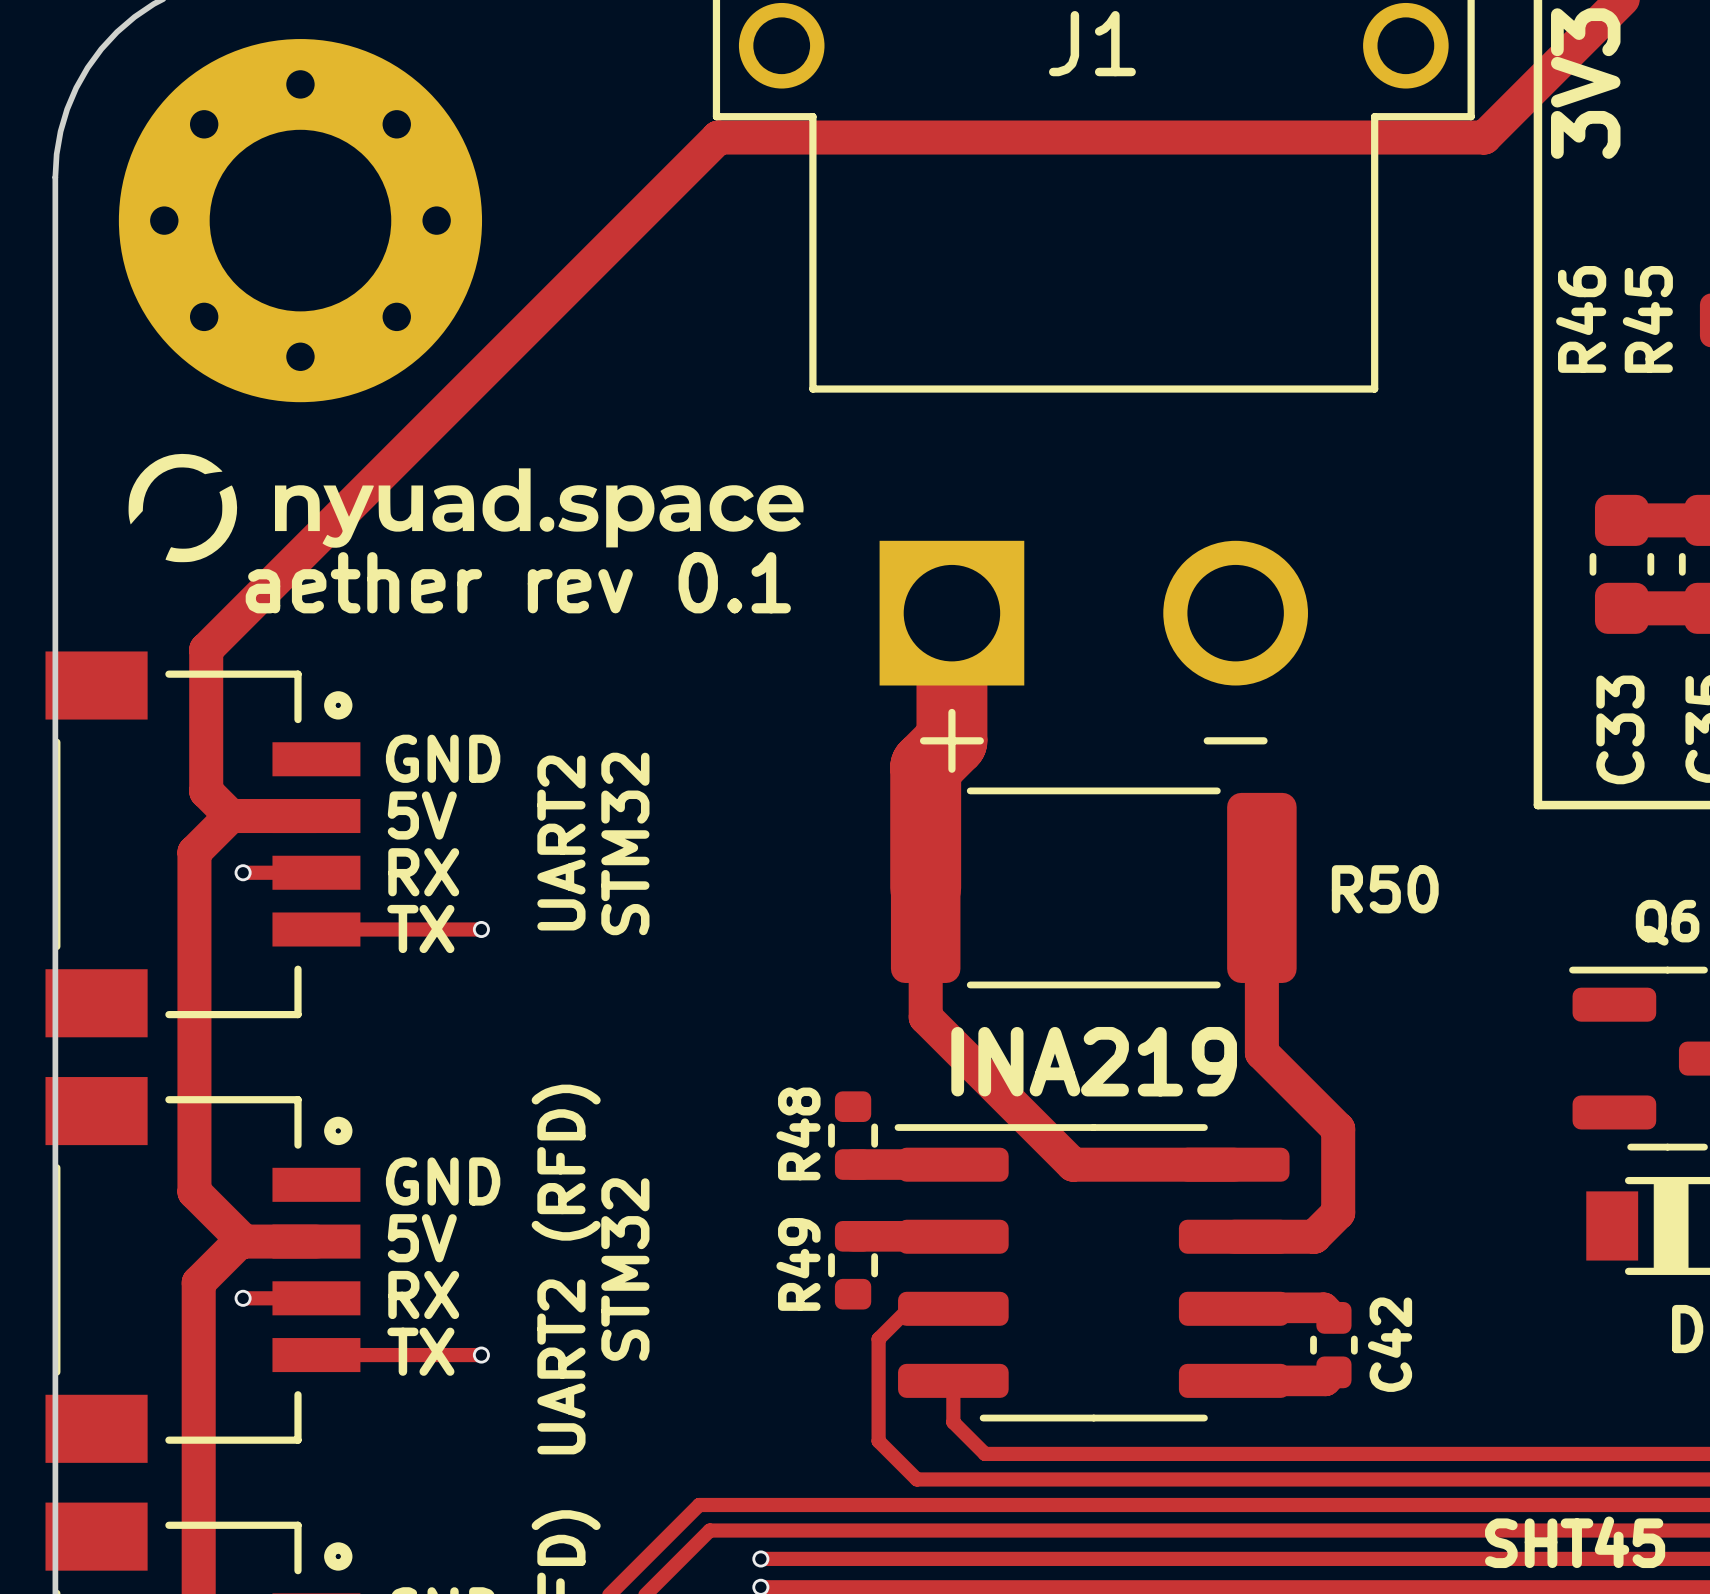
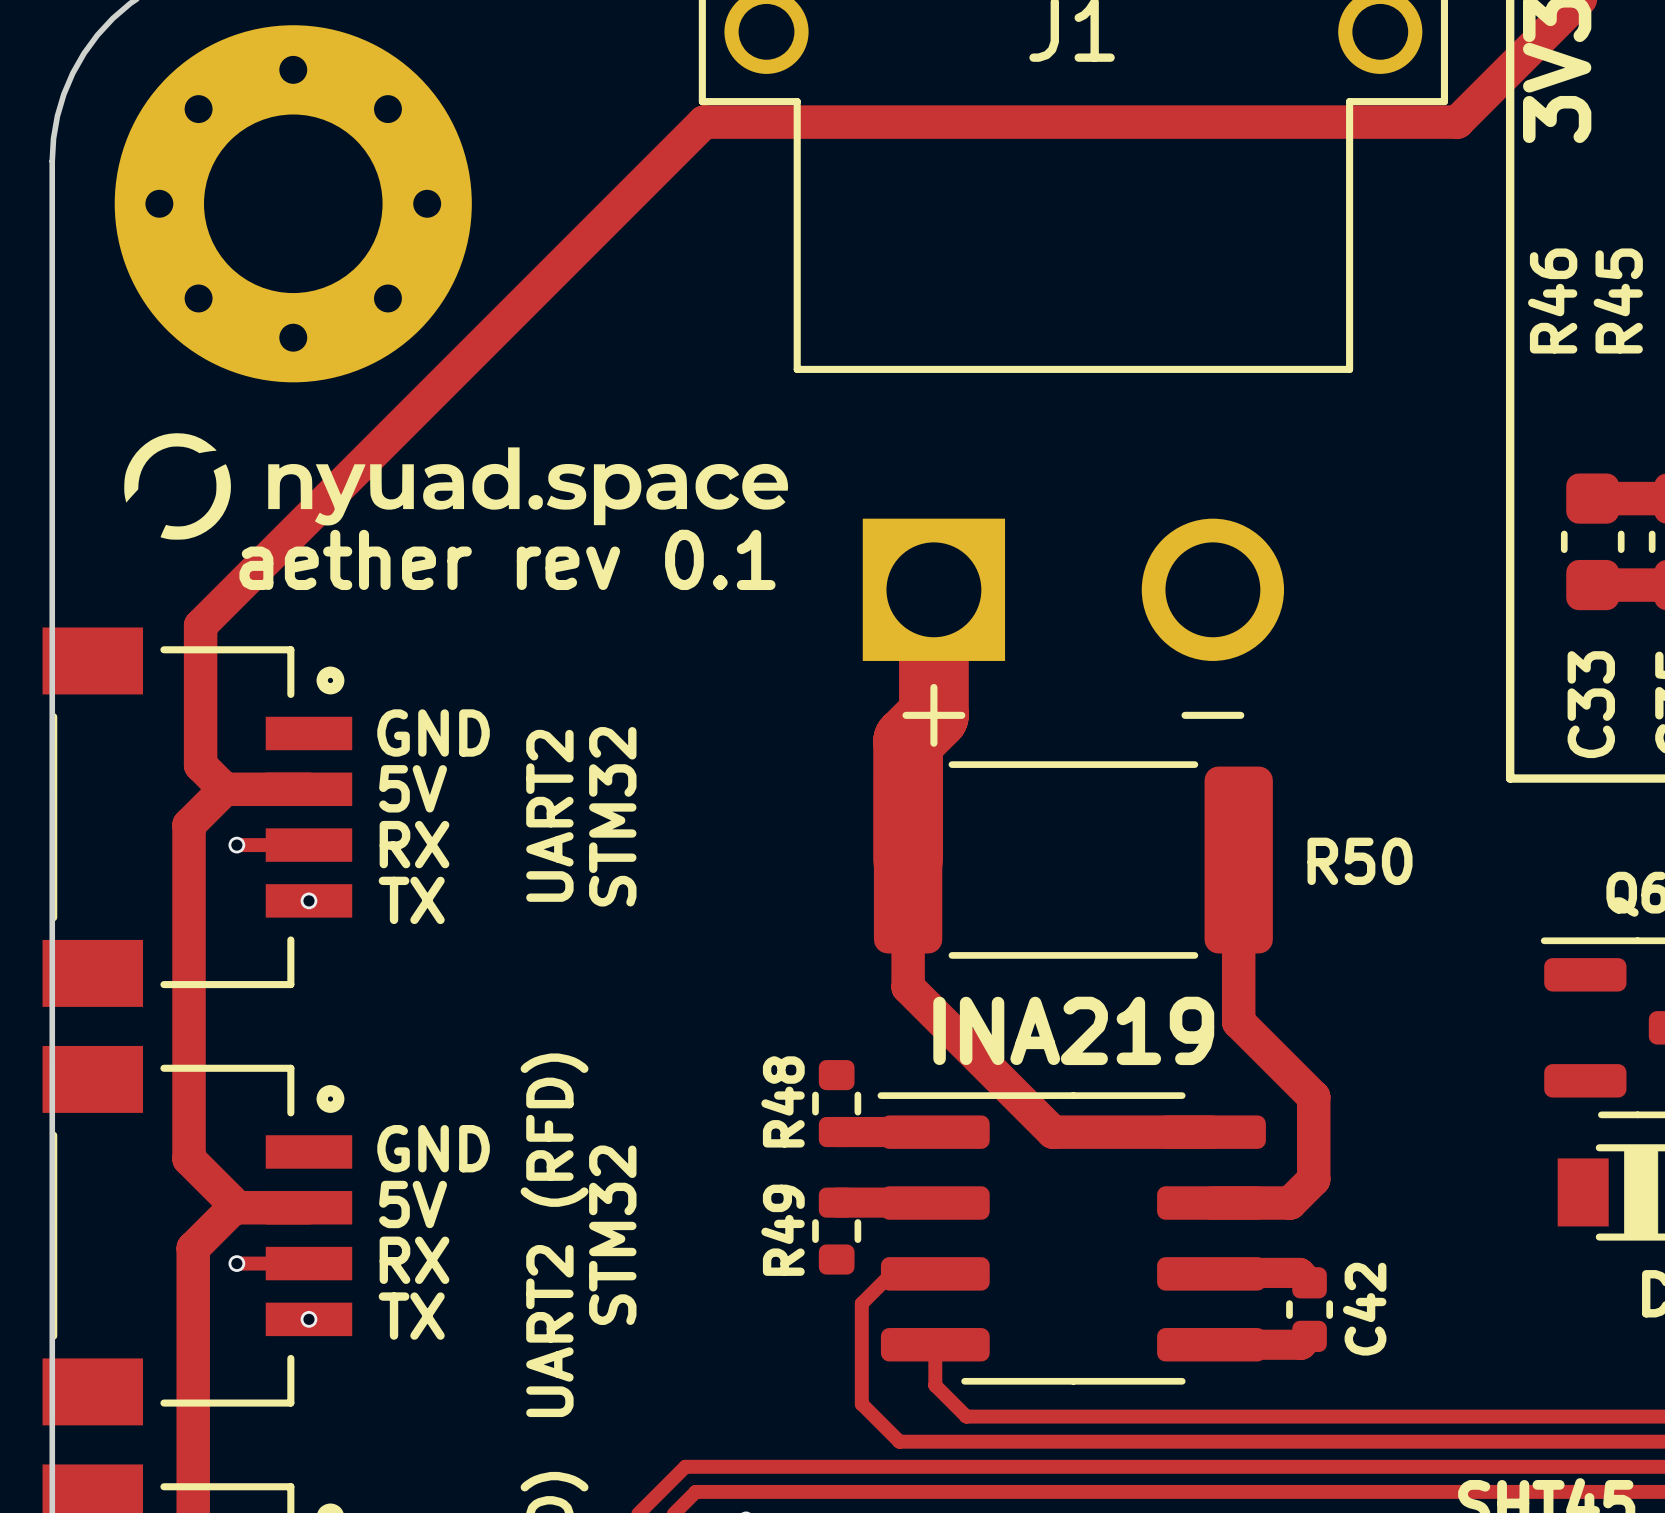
track: (316, 929) (481, 929) -> none
via position: (481, 929) -> (308, 900)
track: (316, 1355) (481, 1355) -> none
via position: (481, 1355) -> (308, 1319)

